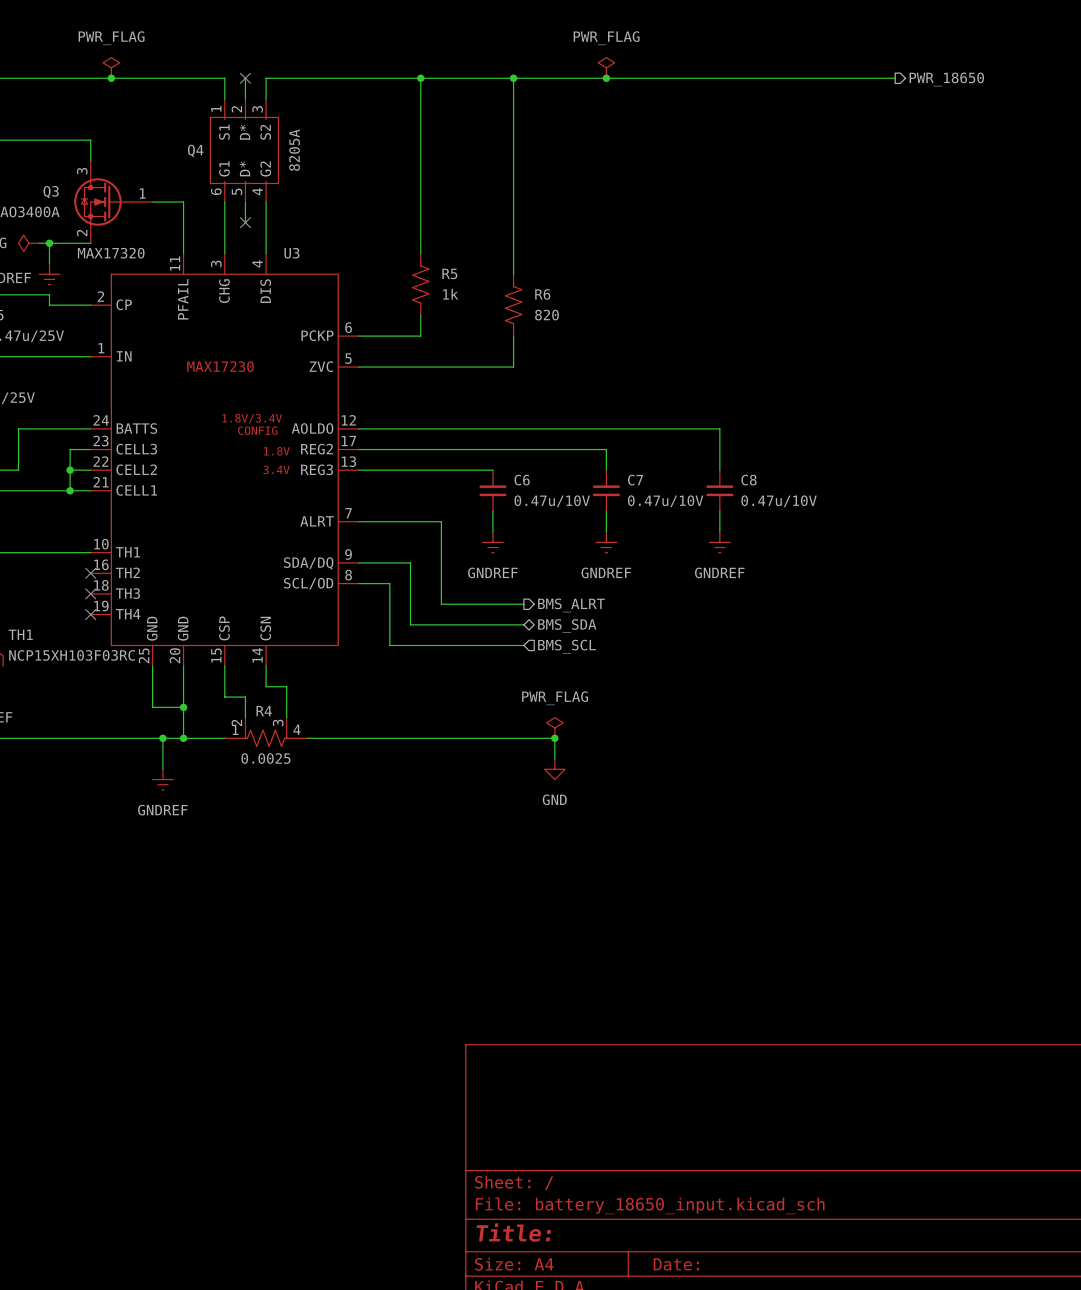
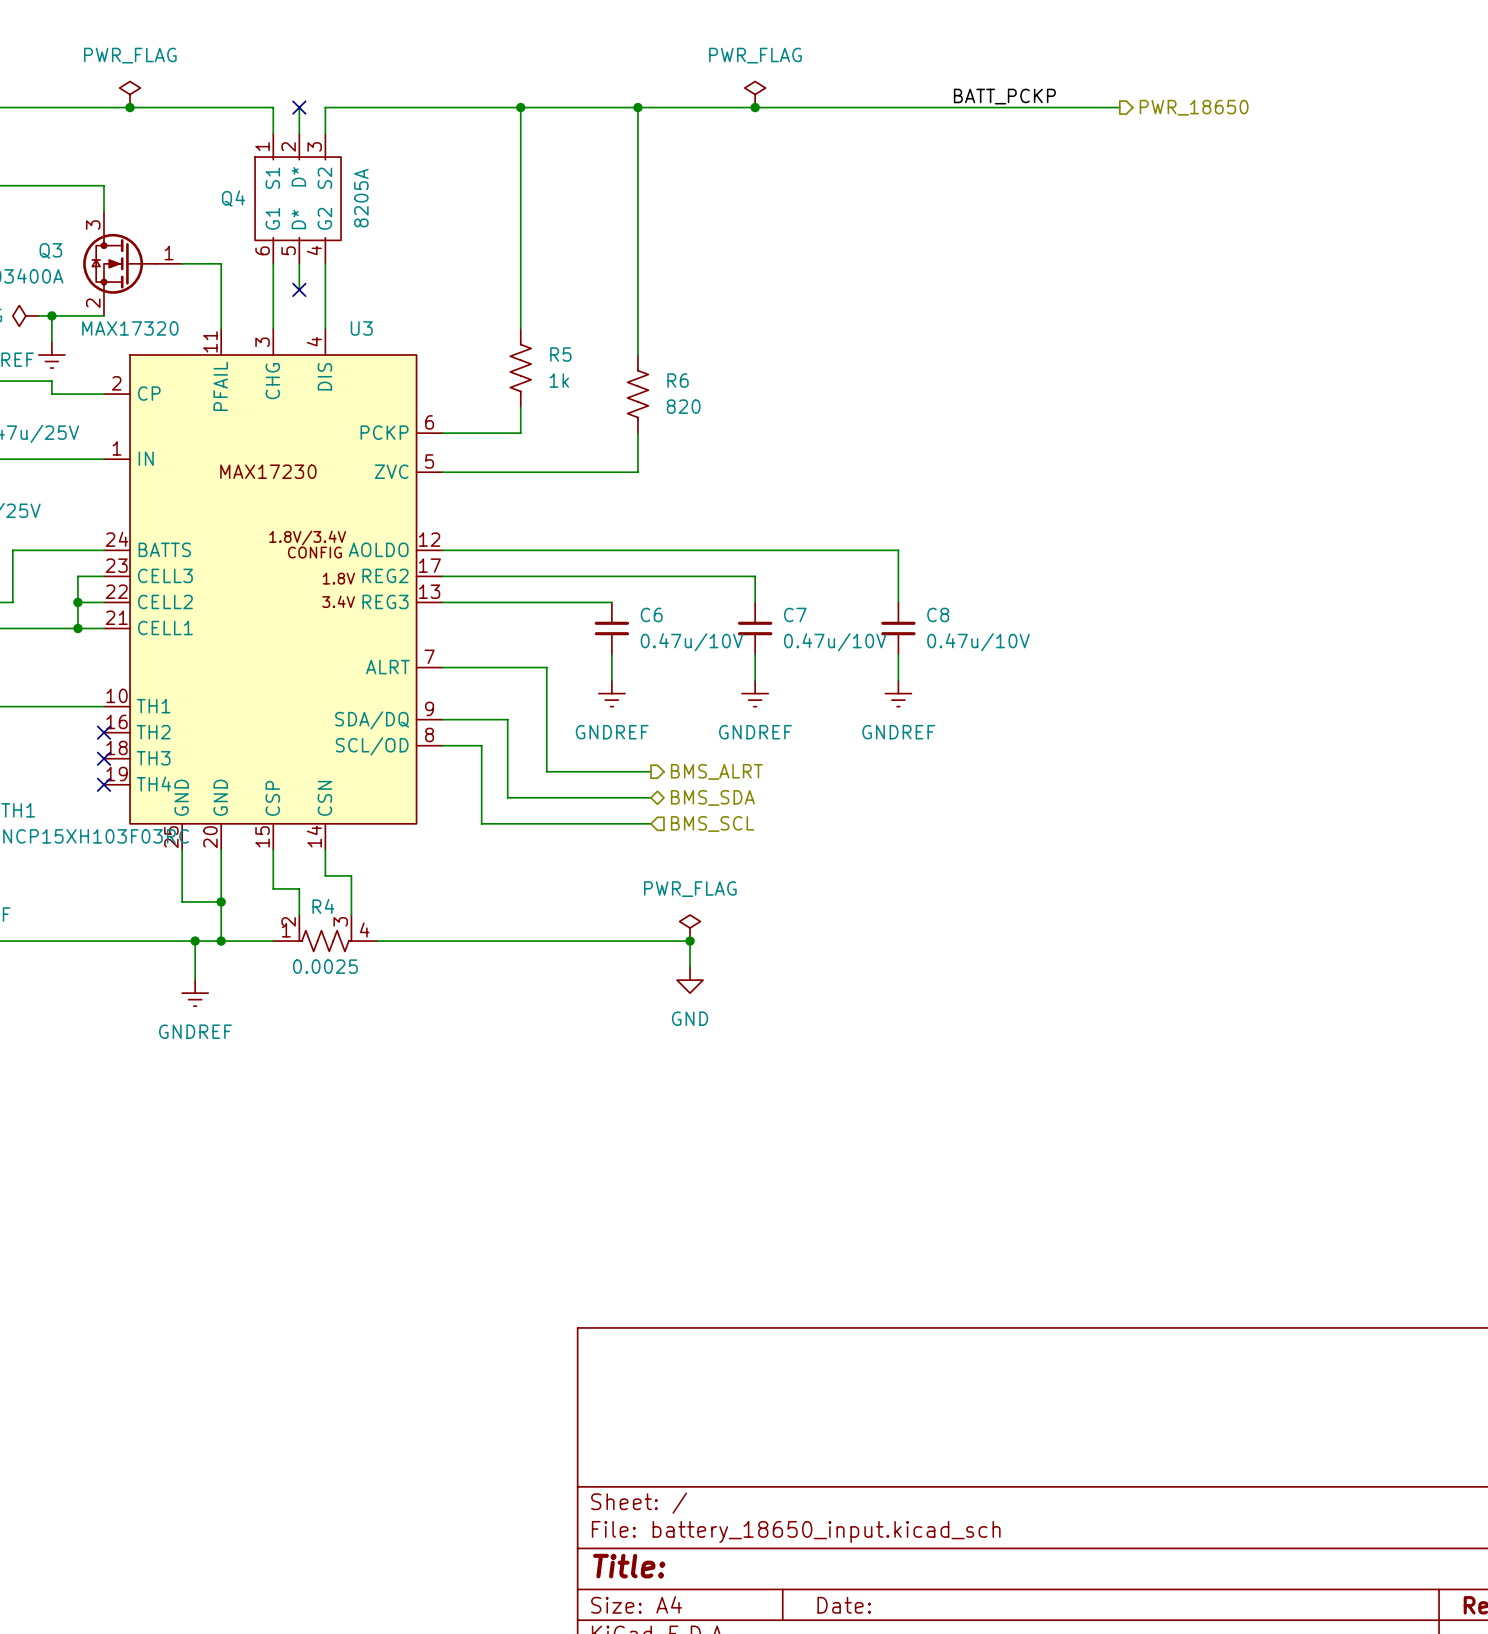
label: none -> BATT_PCKP (1004, 96)

